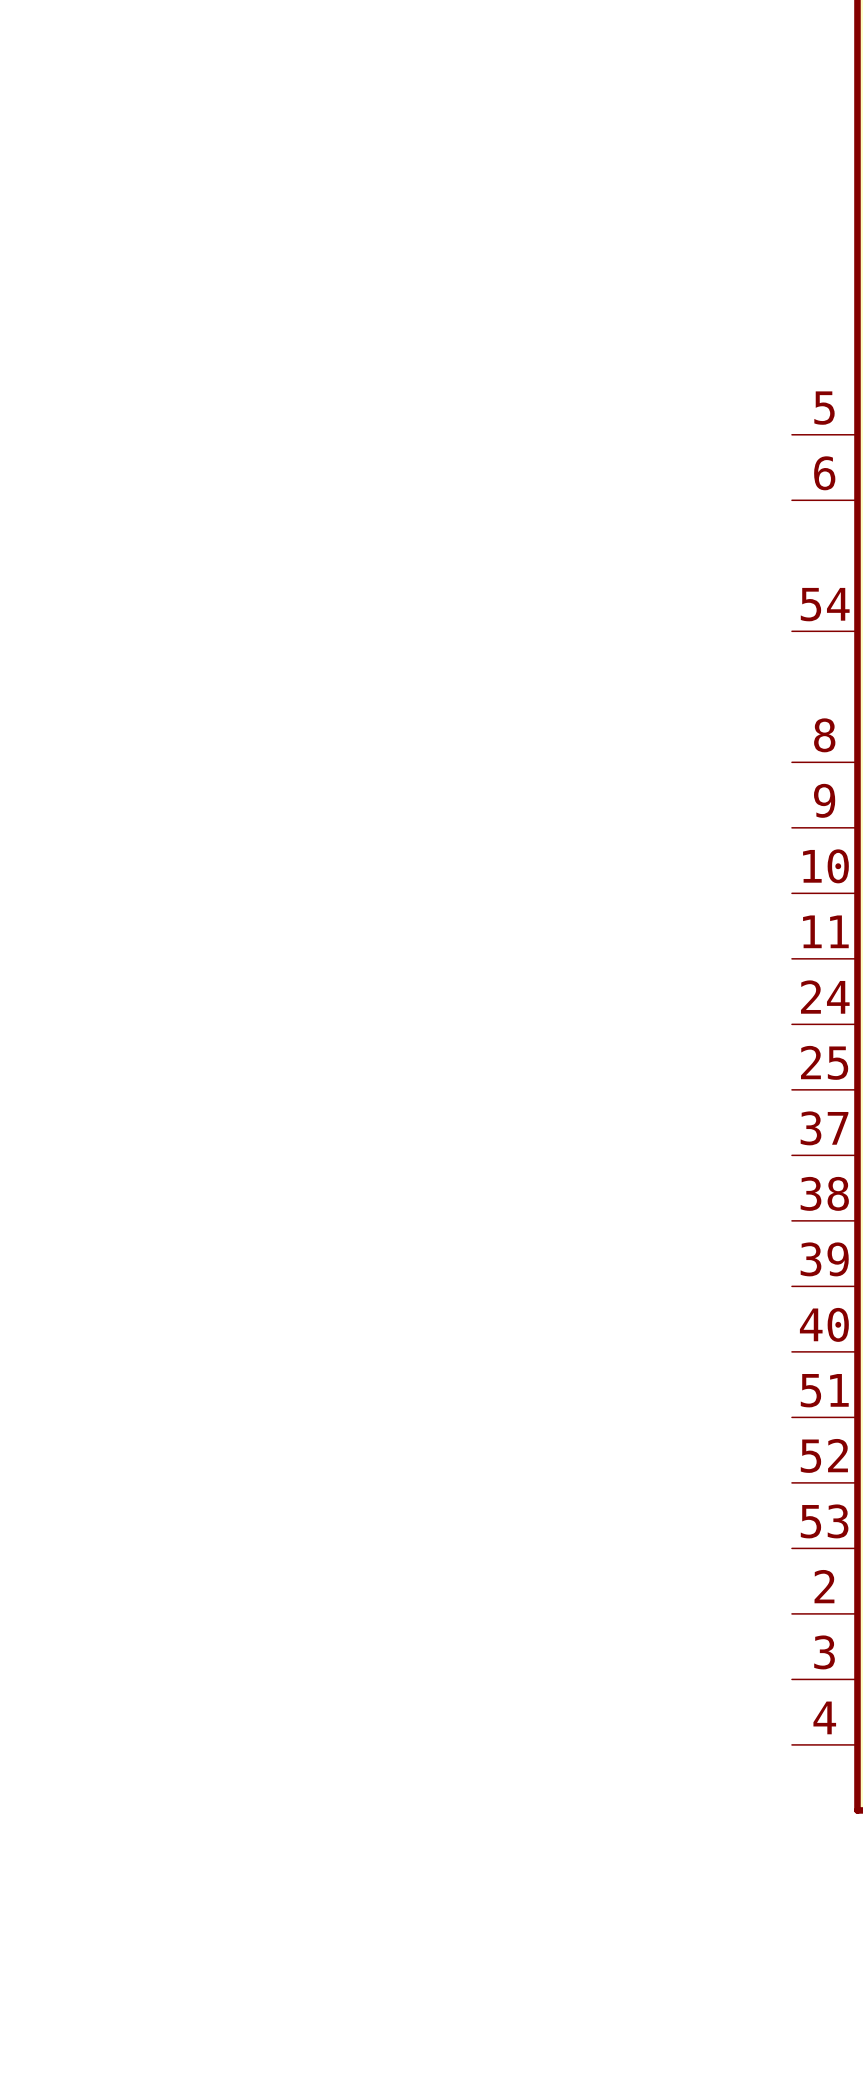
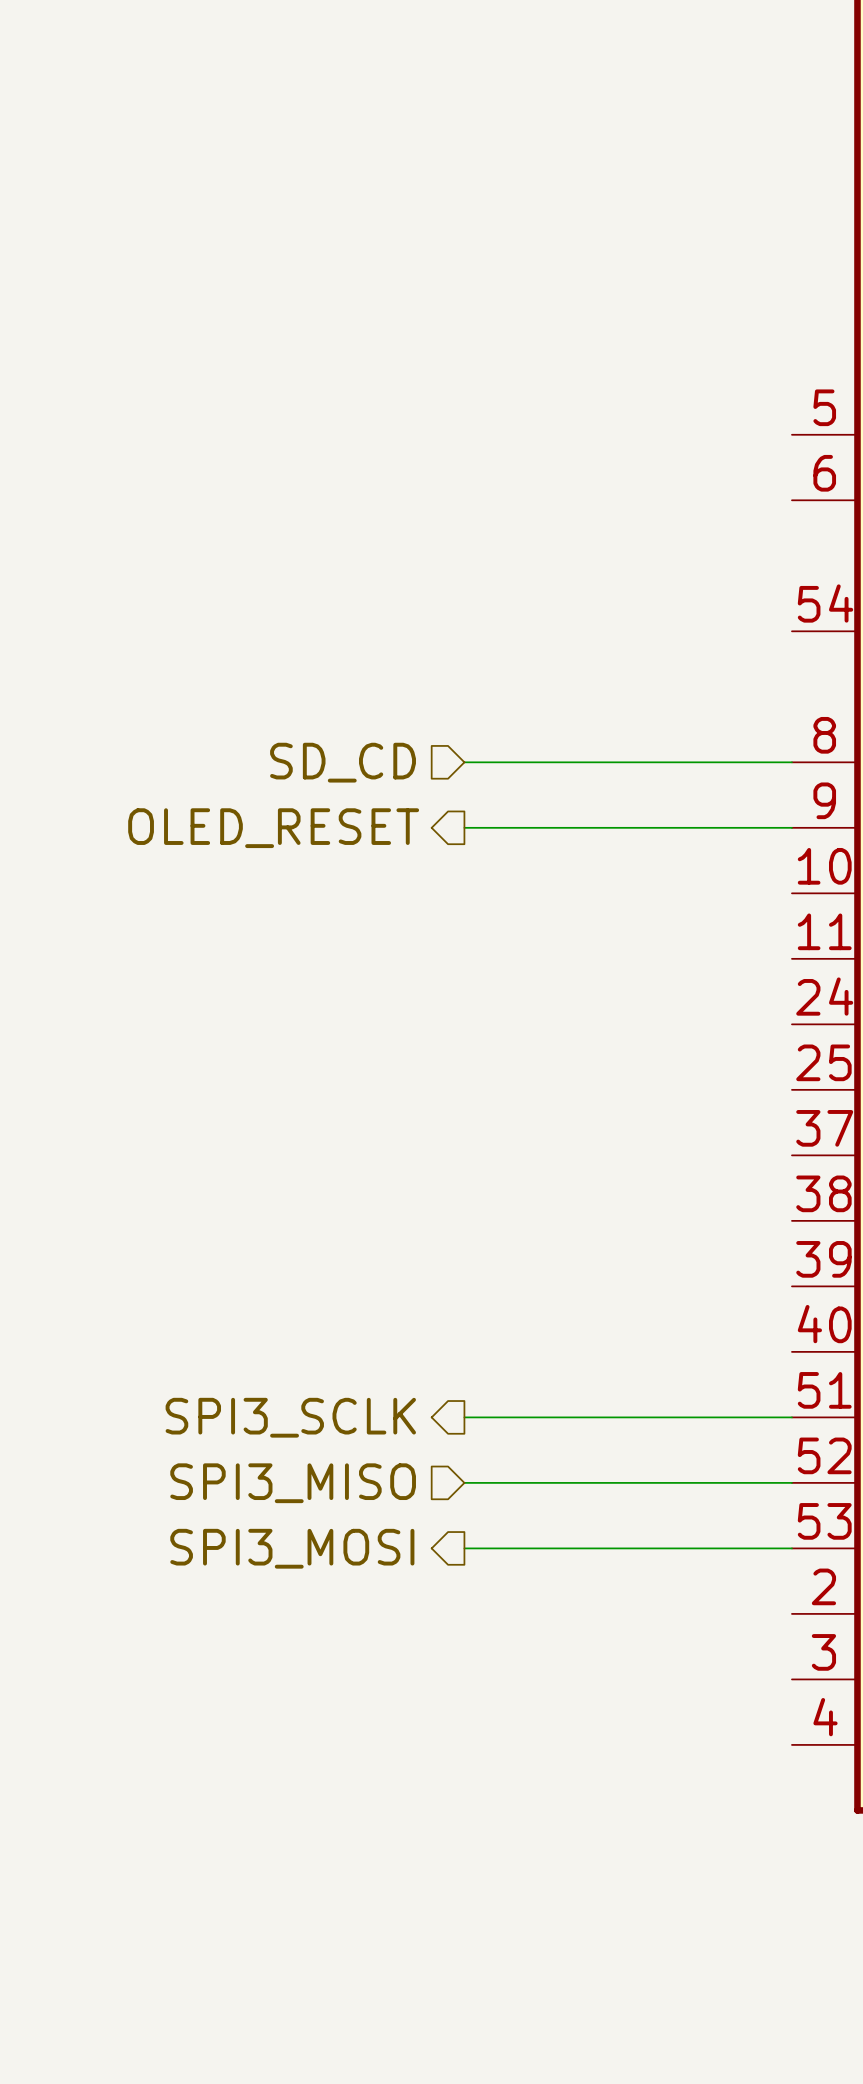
wire: none -> (464, 762) (791, 762)
hierarchical label: none -> SD_CD (343, 762)
wire: none -> (464, 827) (791, 827)
hierarchical label: none -> OLED_RESET (273, 828)
wire: none -> (464, 1417) (791, 1417)
hierarchical label: none -> SPI3_SCLK (290, 1417)
wire: none -> (464, 1482) (791, 1482)
hierarchical label: none -> SPI3_MISO (293, 1483)
wire: none -> (464, 1548) (791, 1548)
hierarchical label: none -> SPI3_MOSI (292, 1548)

